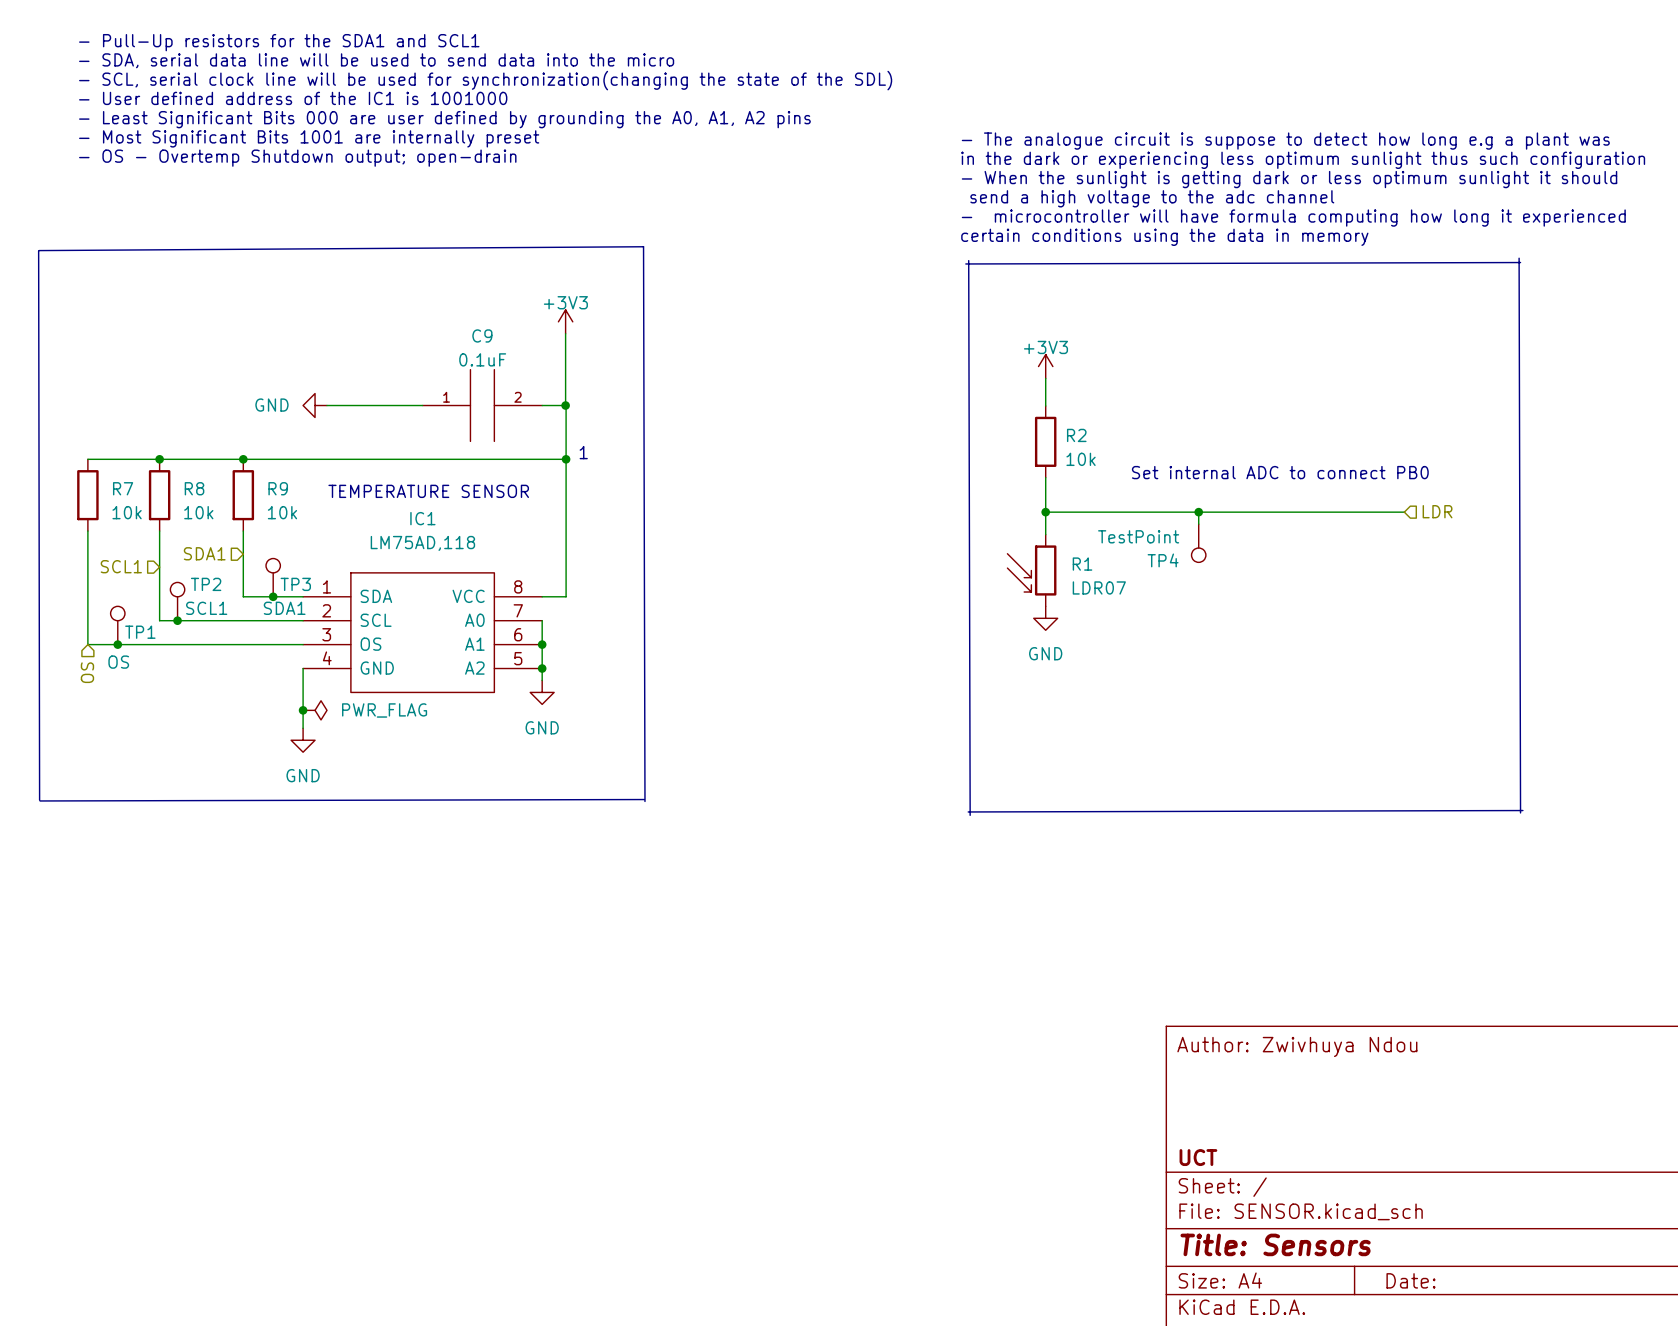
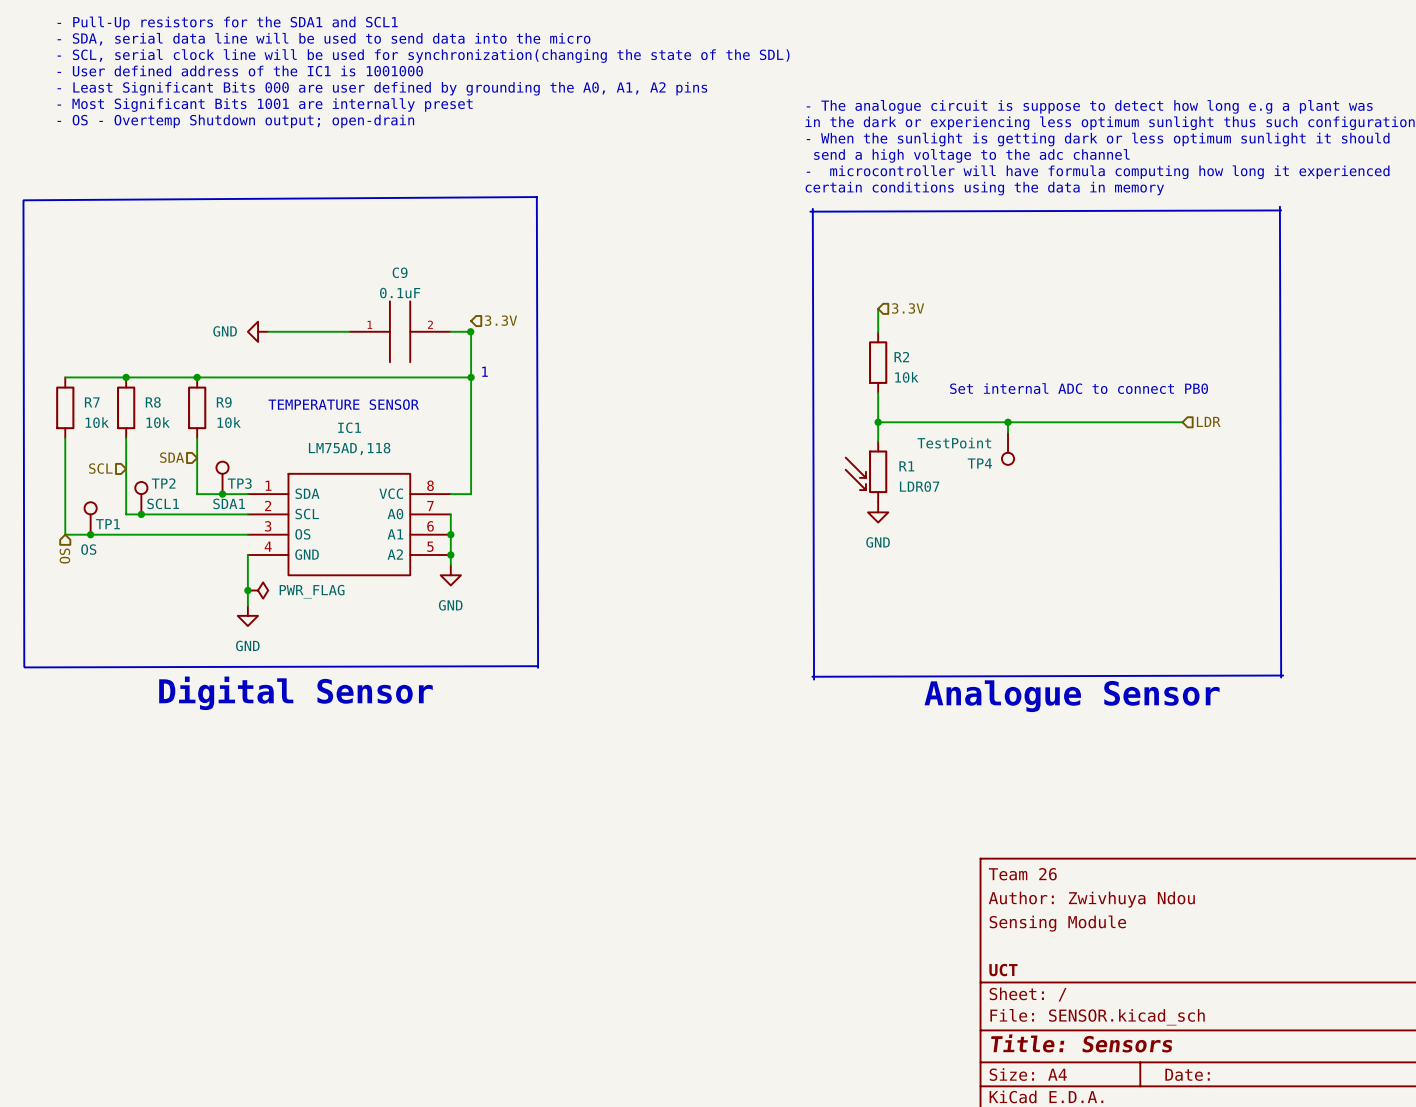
power symbol: +3V3 (565, 321) -> none
wire: (565, 333) (565, 405) -> none
power symbol: +3V3 (1045, 366) -> none
hierarchical label: none -> 3.3V (908, 308)
hierarchical label: none -> 3.3V (501, 320)
hierarchical label: SDA1 (204, 553) -> SDA (172, 457)
hierarchical label: SCL1 (121, 566) -> SCL (100, 468)
text: none -> Digital Sensor (295, 693)
text: none -> Analogue Sensor (1072, 696)
title block: Author: Zwivhuya Ndou (1297, 1046) -> Team 26 (1022, 874)
title block: none -> Author: Zwivhuya Ndou (1091, 899)
title block: none -> Sensing Module (1057, 923)

